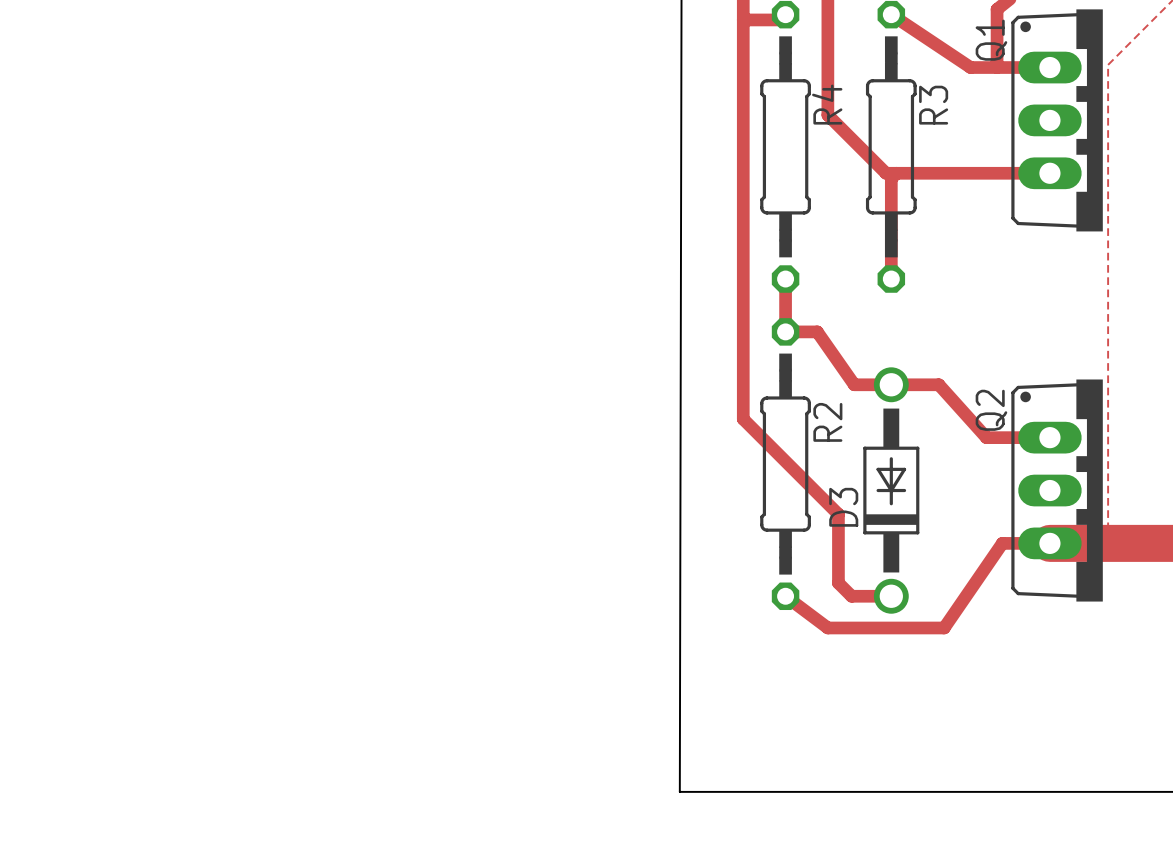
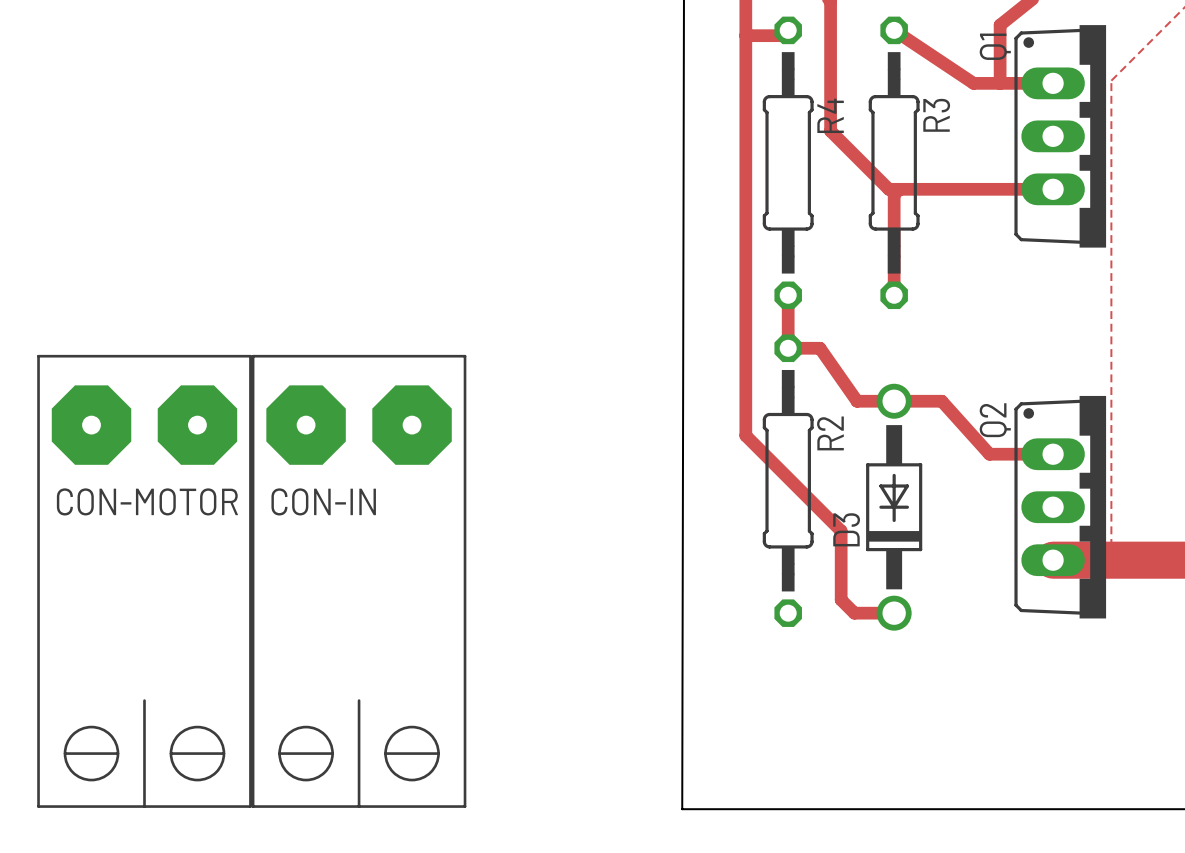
track: (1049, 543) (1002, 543) (944, 627) (827, 627) (785, 596) -> none
CON-MOTOR: none -> (144, 581)
CON-IN: none -> (359, 581)

